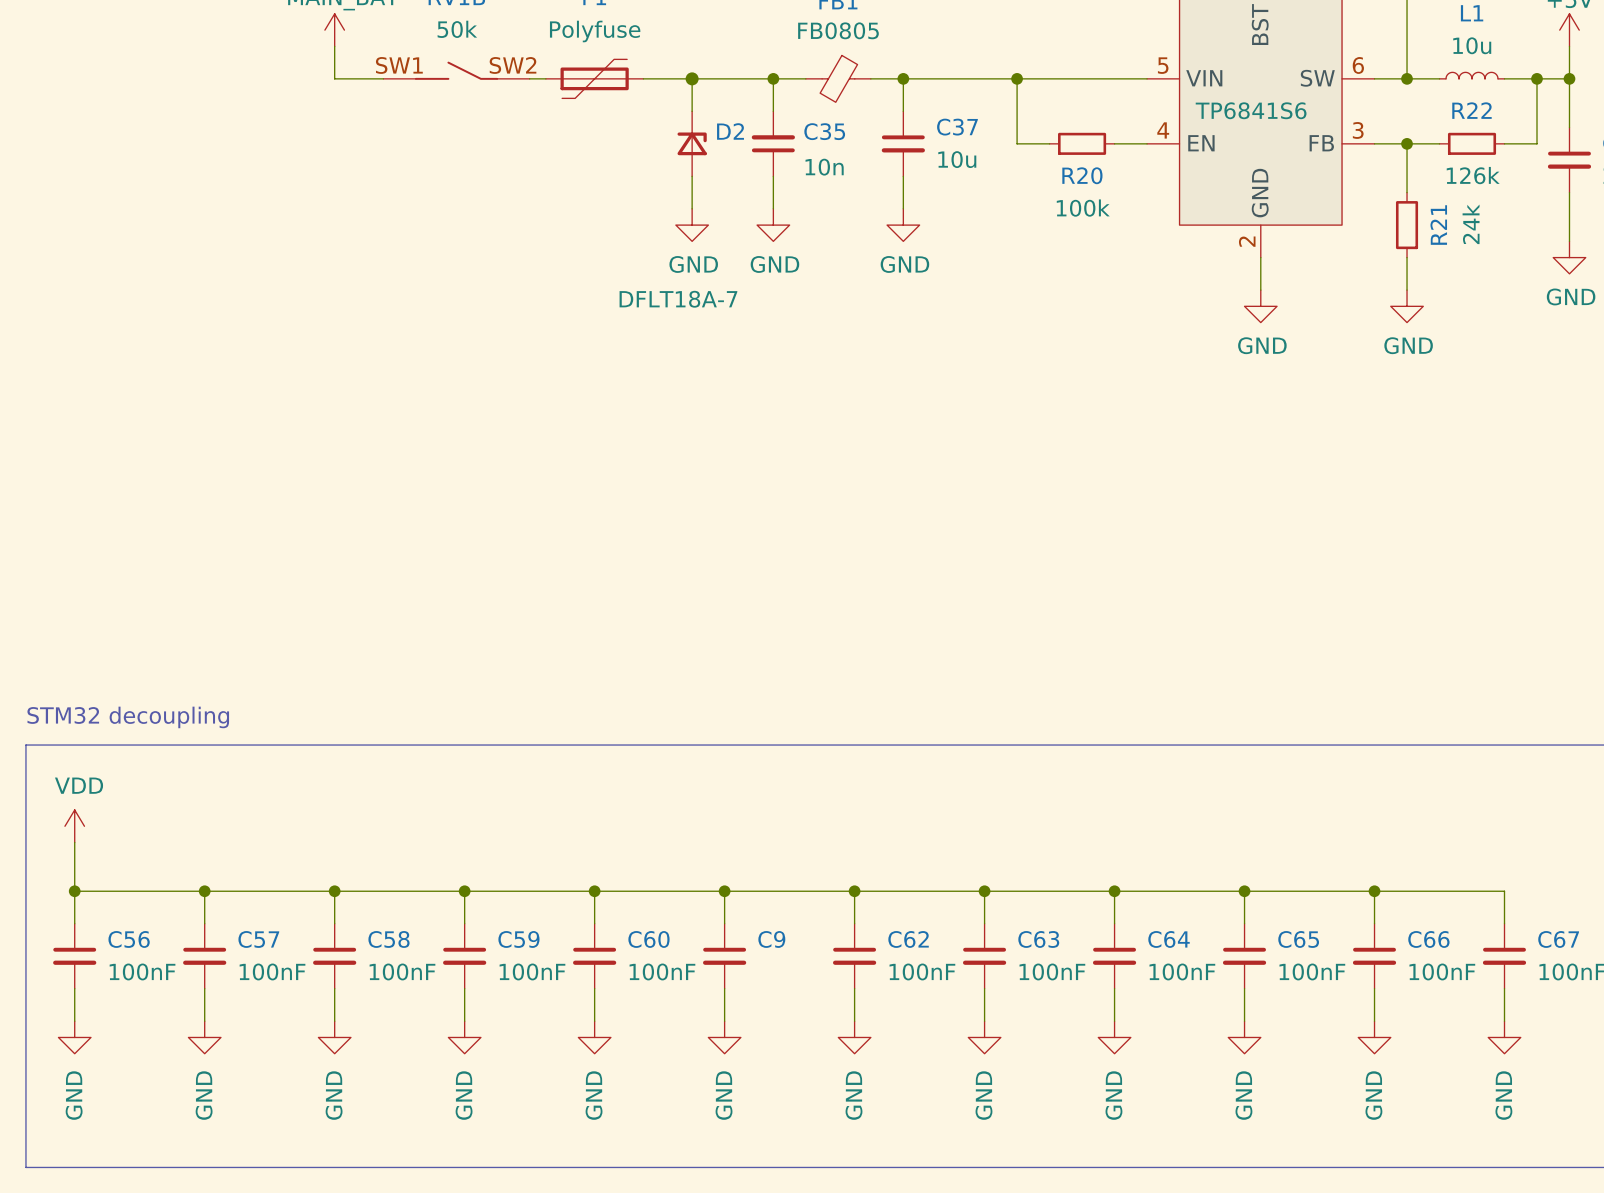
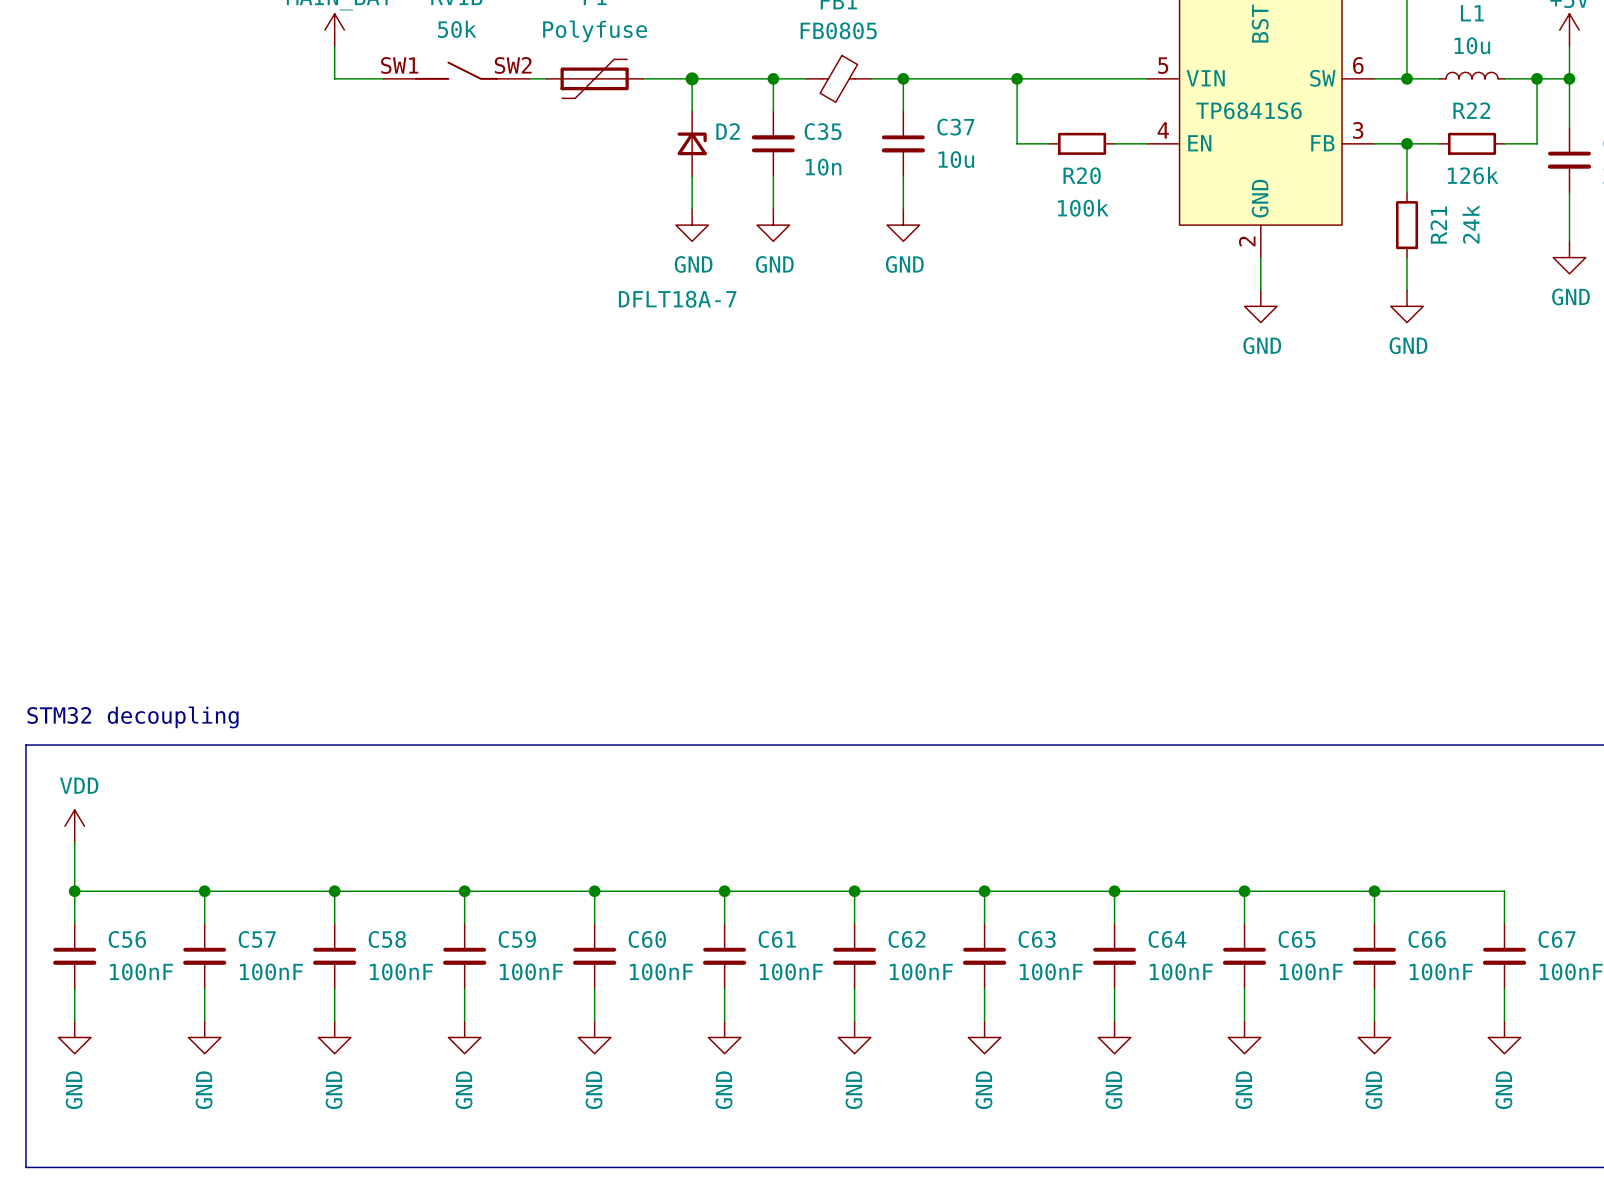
C9 name: C9 (771, 939) -> C61 (777, 939)
C9 value: none -> 100nF (791, 971)

